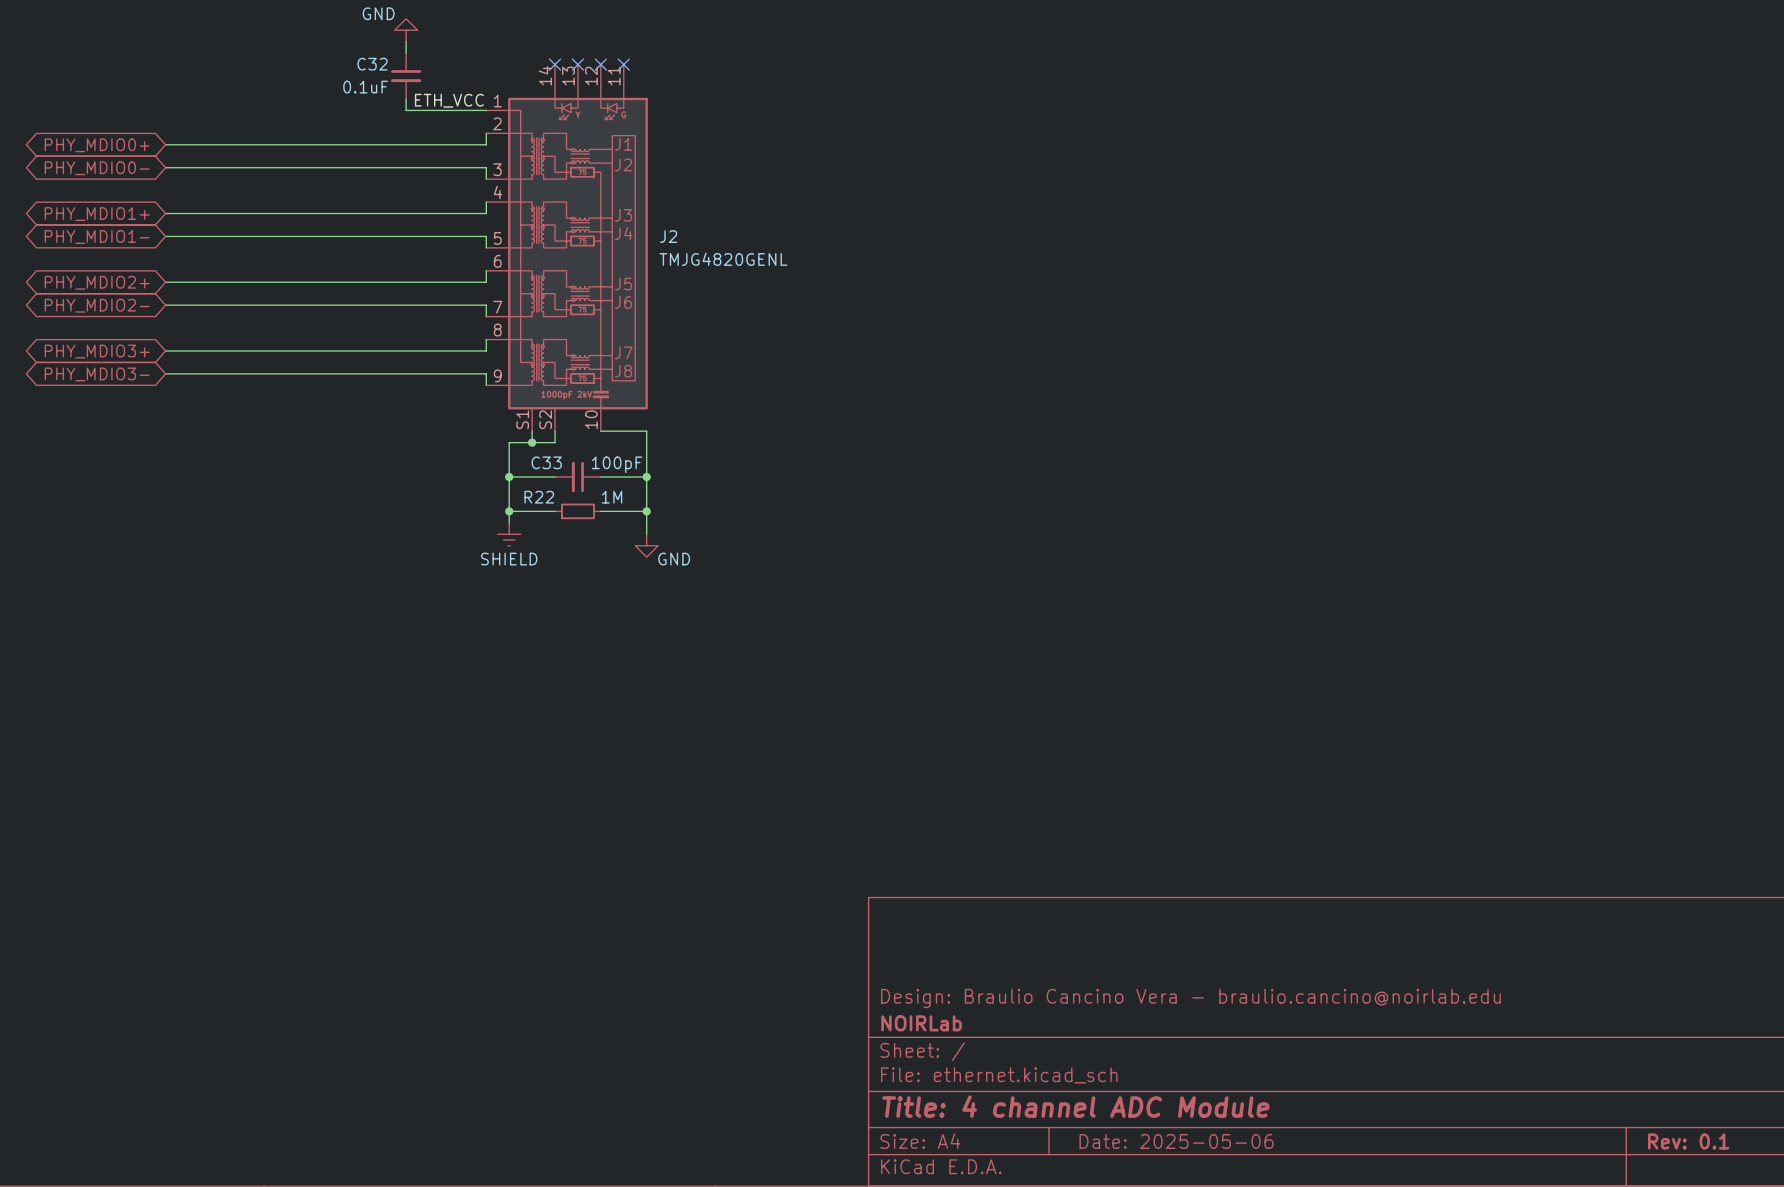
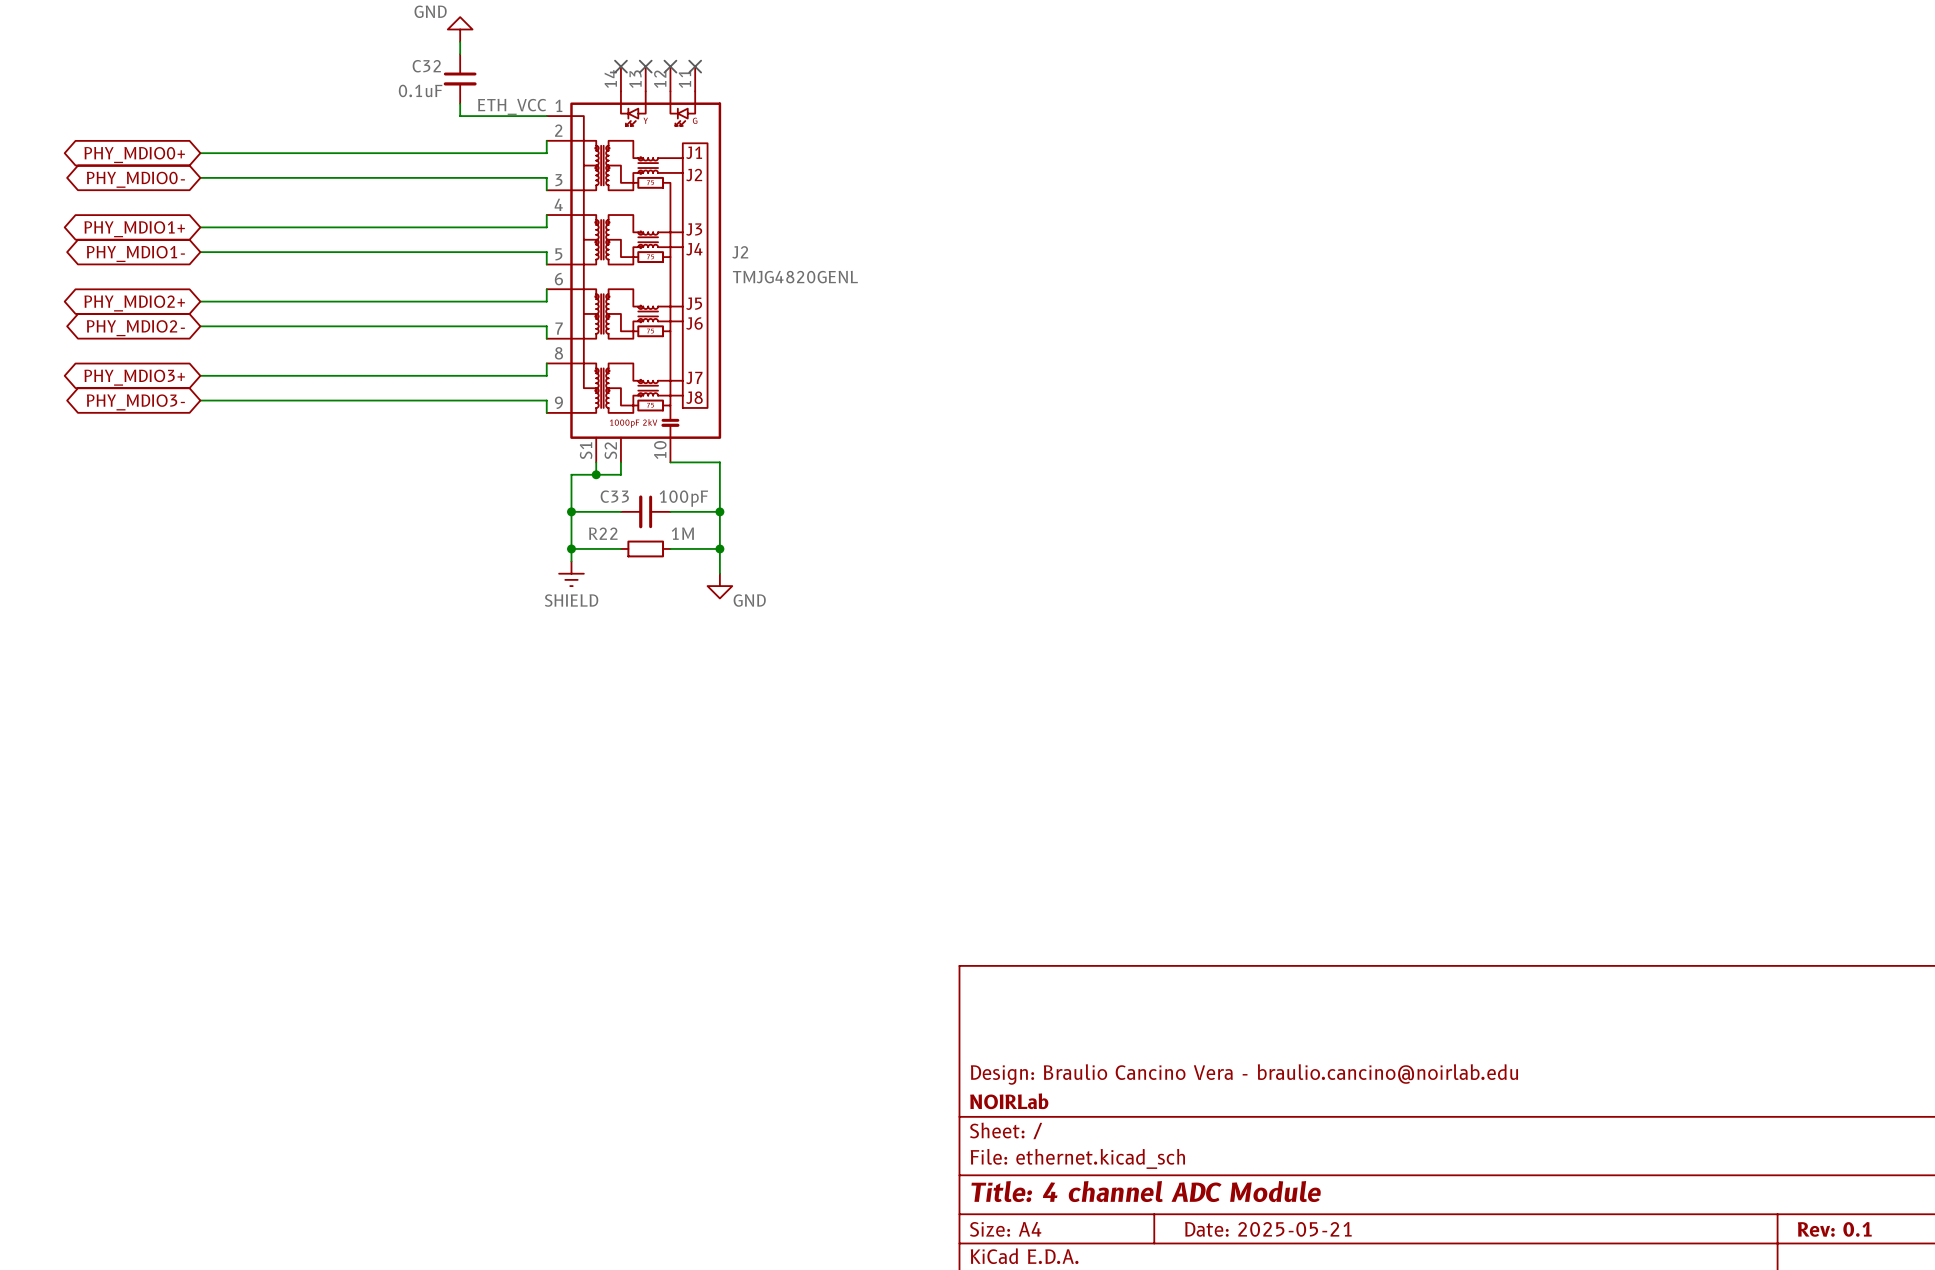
title block: Date: 2025-05-06 (1176, 1141) -> Date: 2025-05-21 (1268, 1229)

